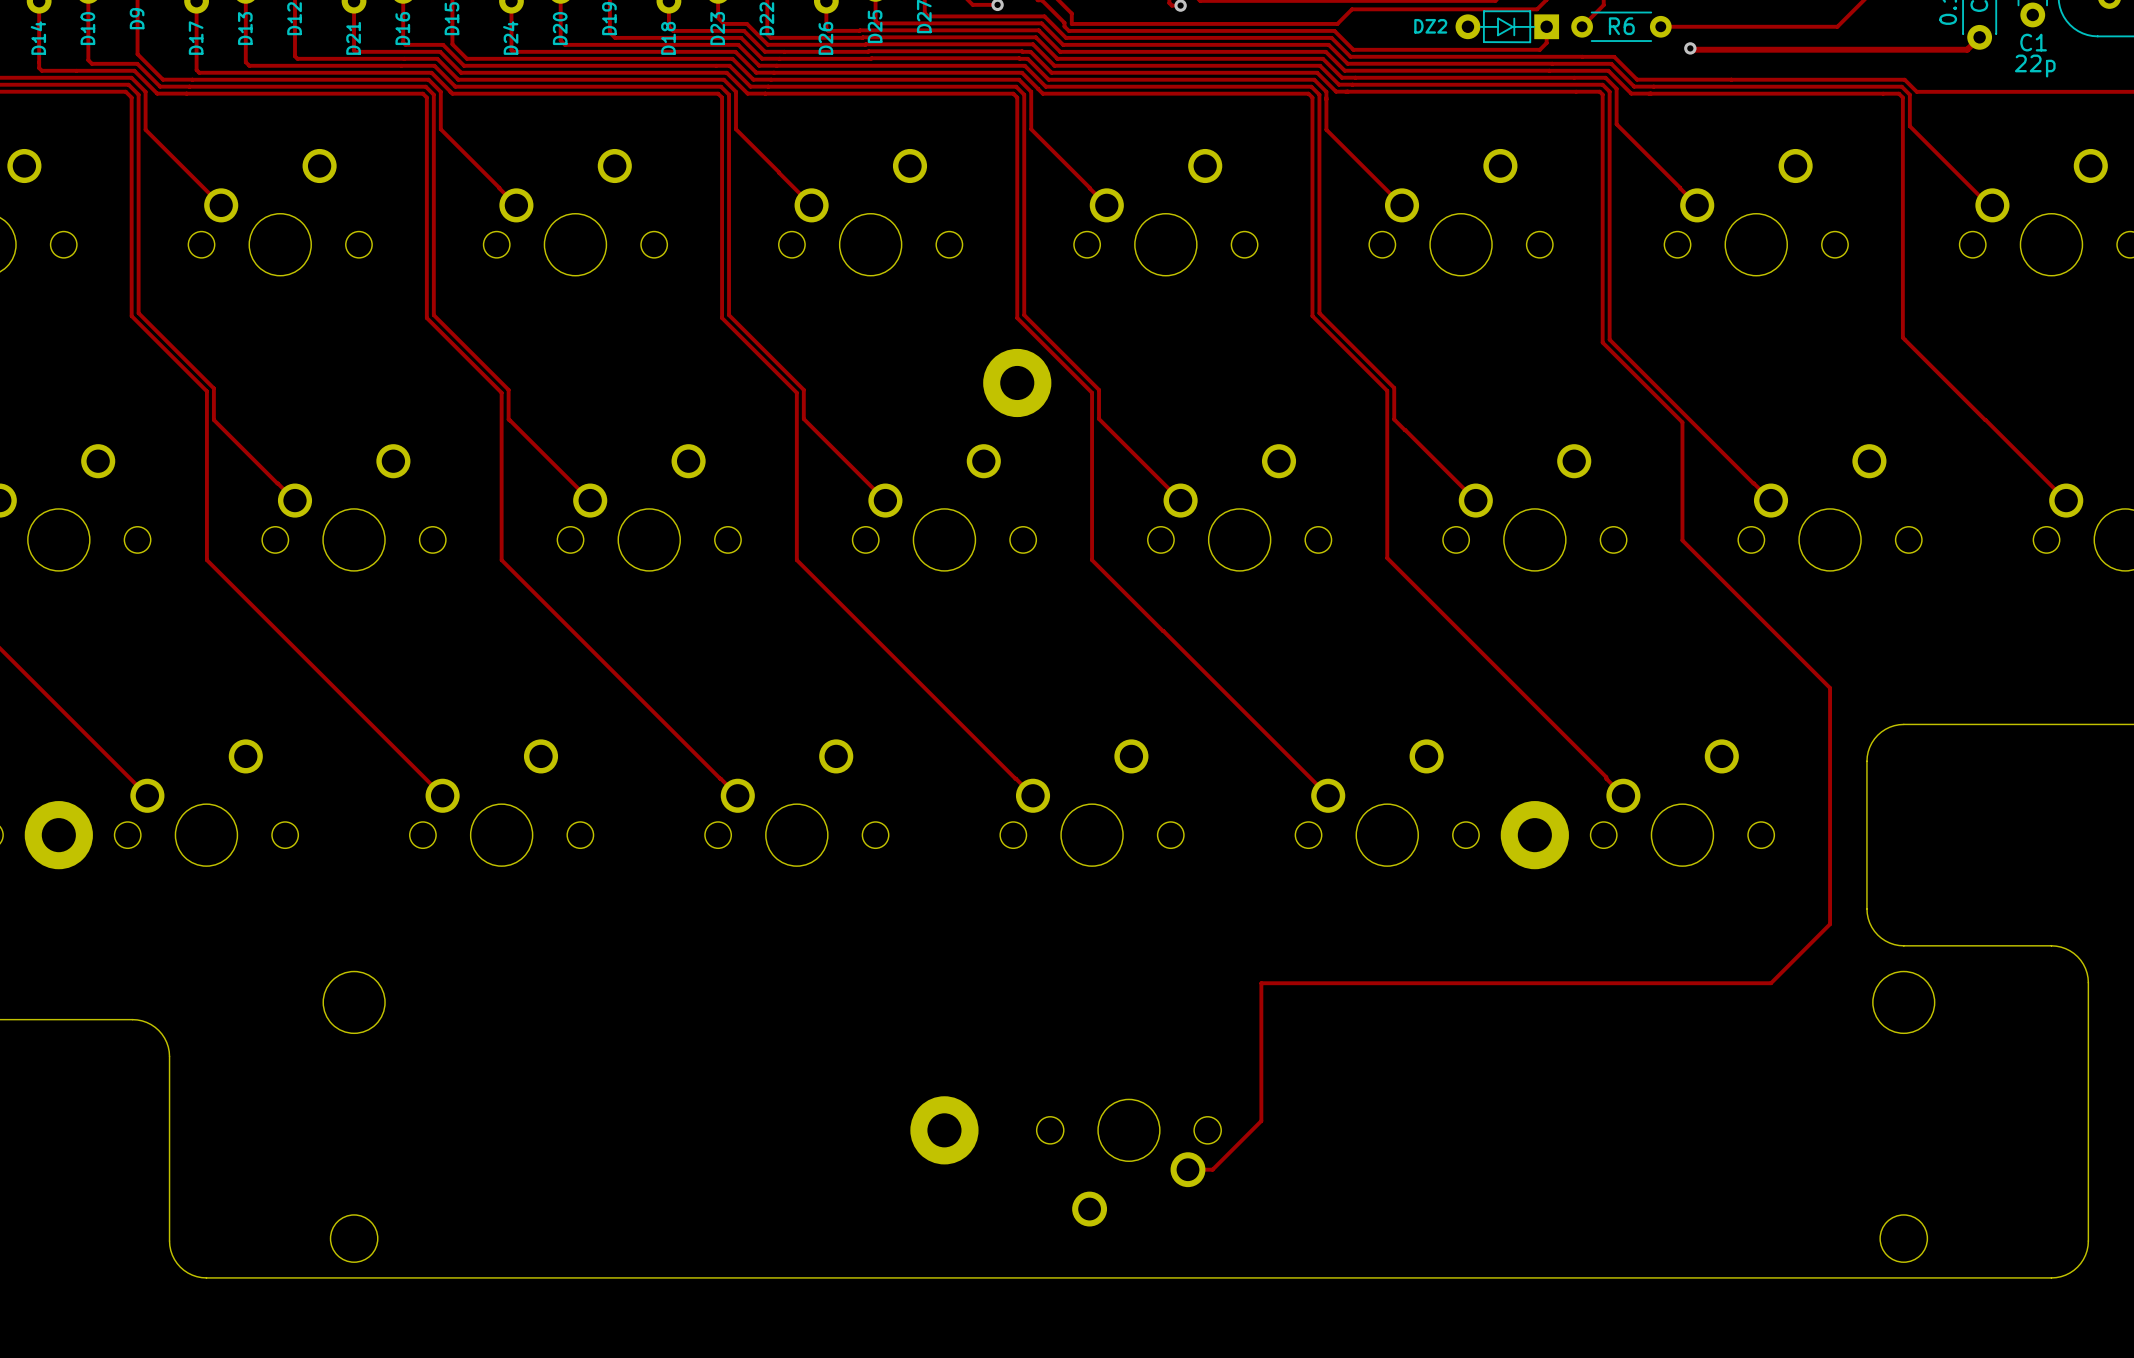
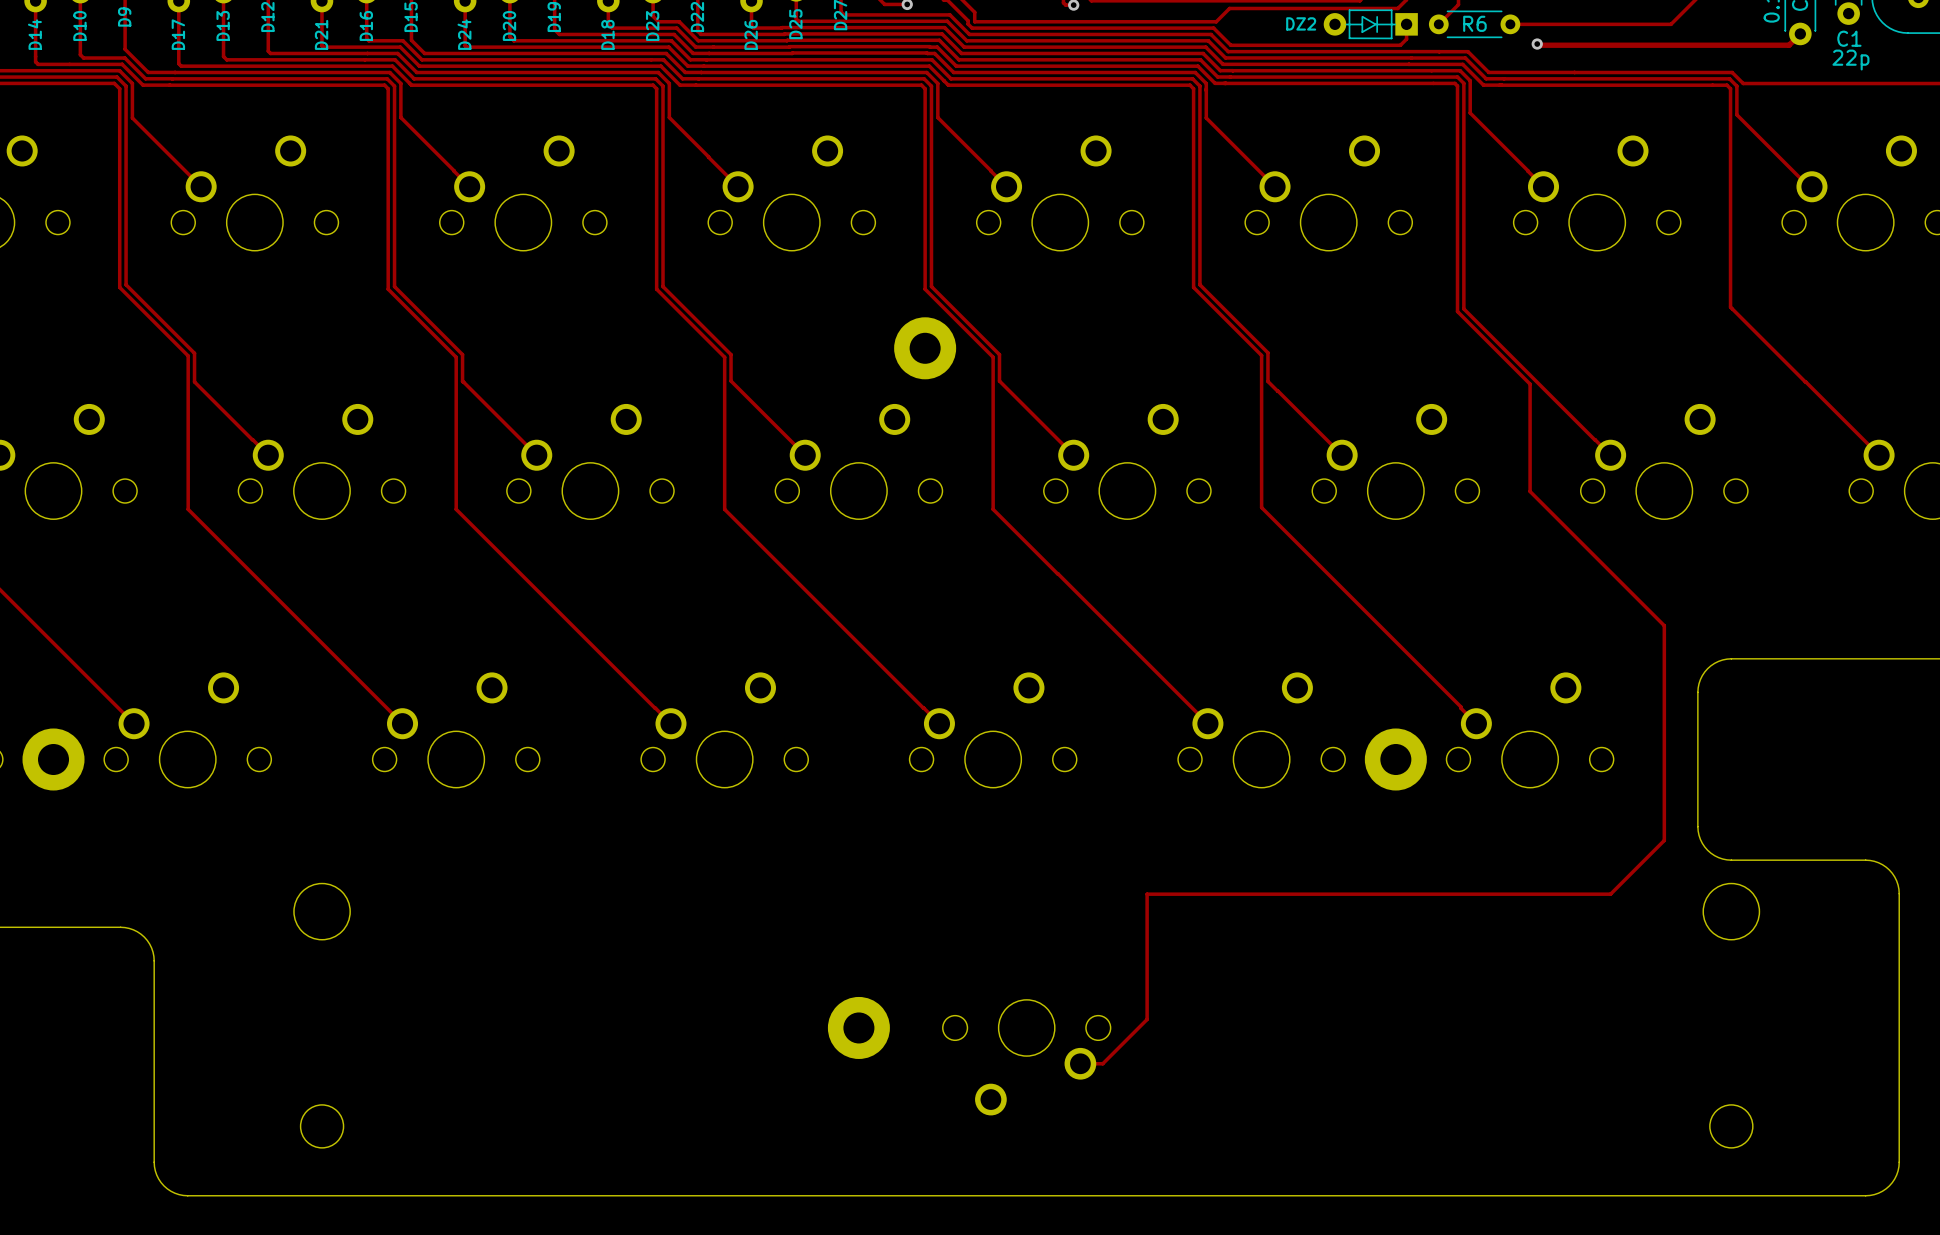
board edge: (169, 1241) (172, 1255) (180, 1267) (192, 1275) (206, 1277) (2051, 1277) (2065, 1275) (2077, 1267) (2085, 1255) (2088, 1241) -> (154, 1128) (154, 1166) (158, 1178) (170, 1191) (187, 1195) (1865, 1195) (1882, 1191) (1894, 1178) (1898, 1166) (1899, 1128)

